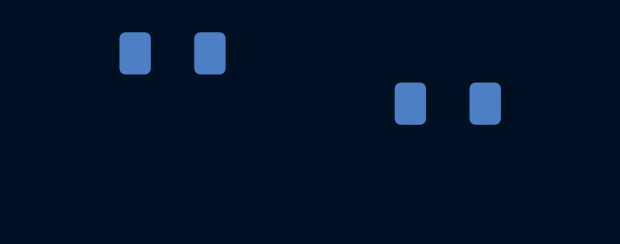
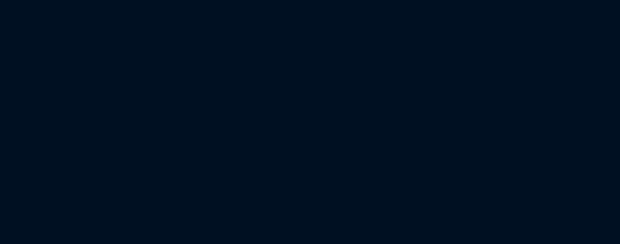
part: (172, 53) -> none
part: (447, 103) -> none

